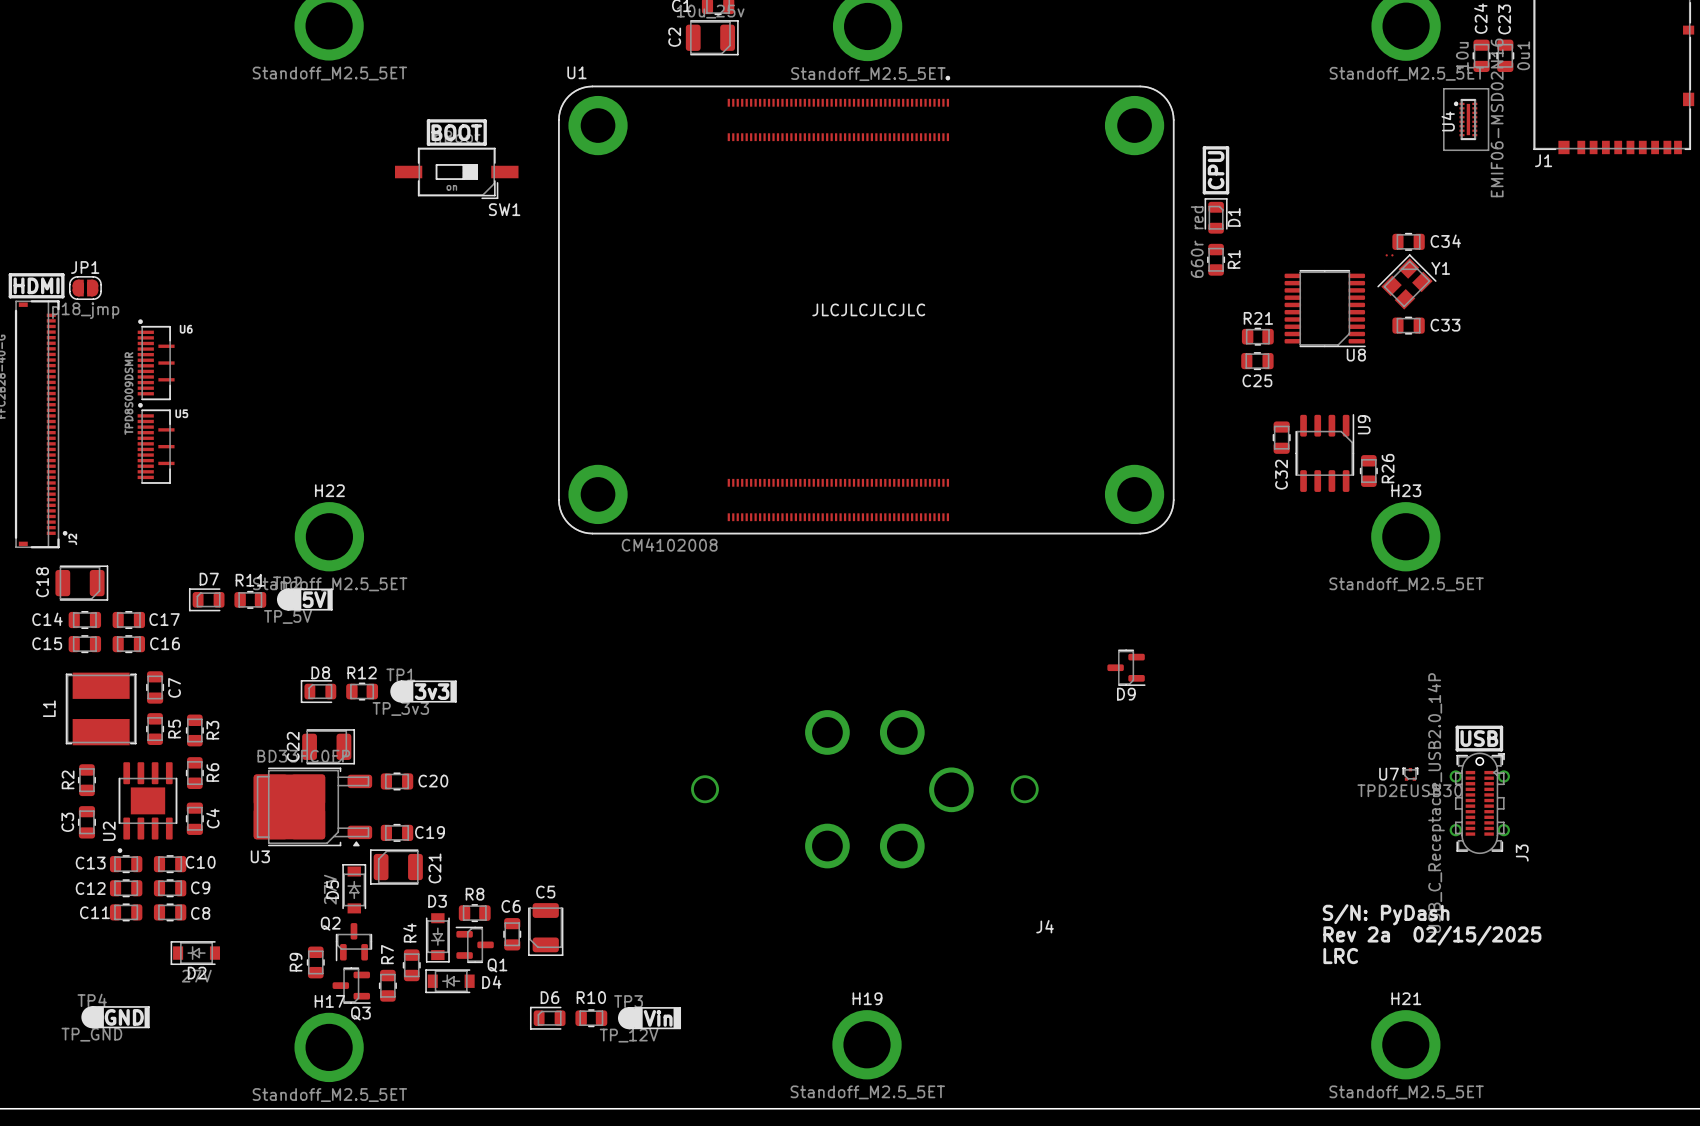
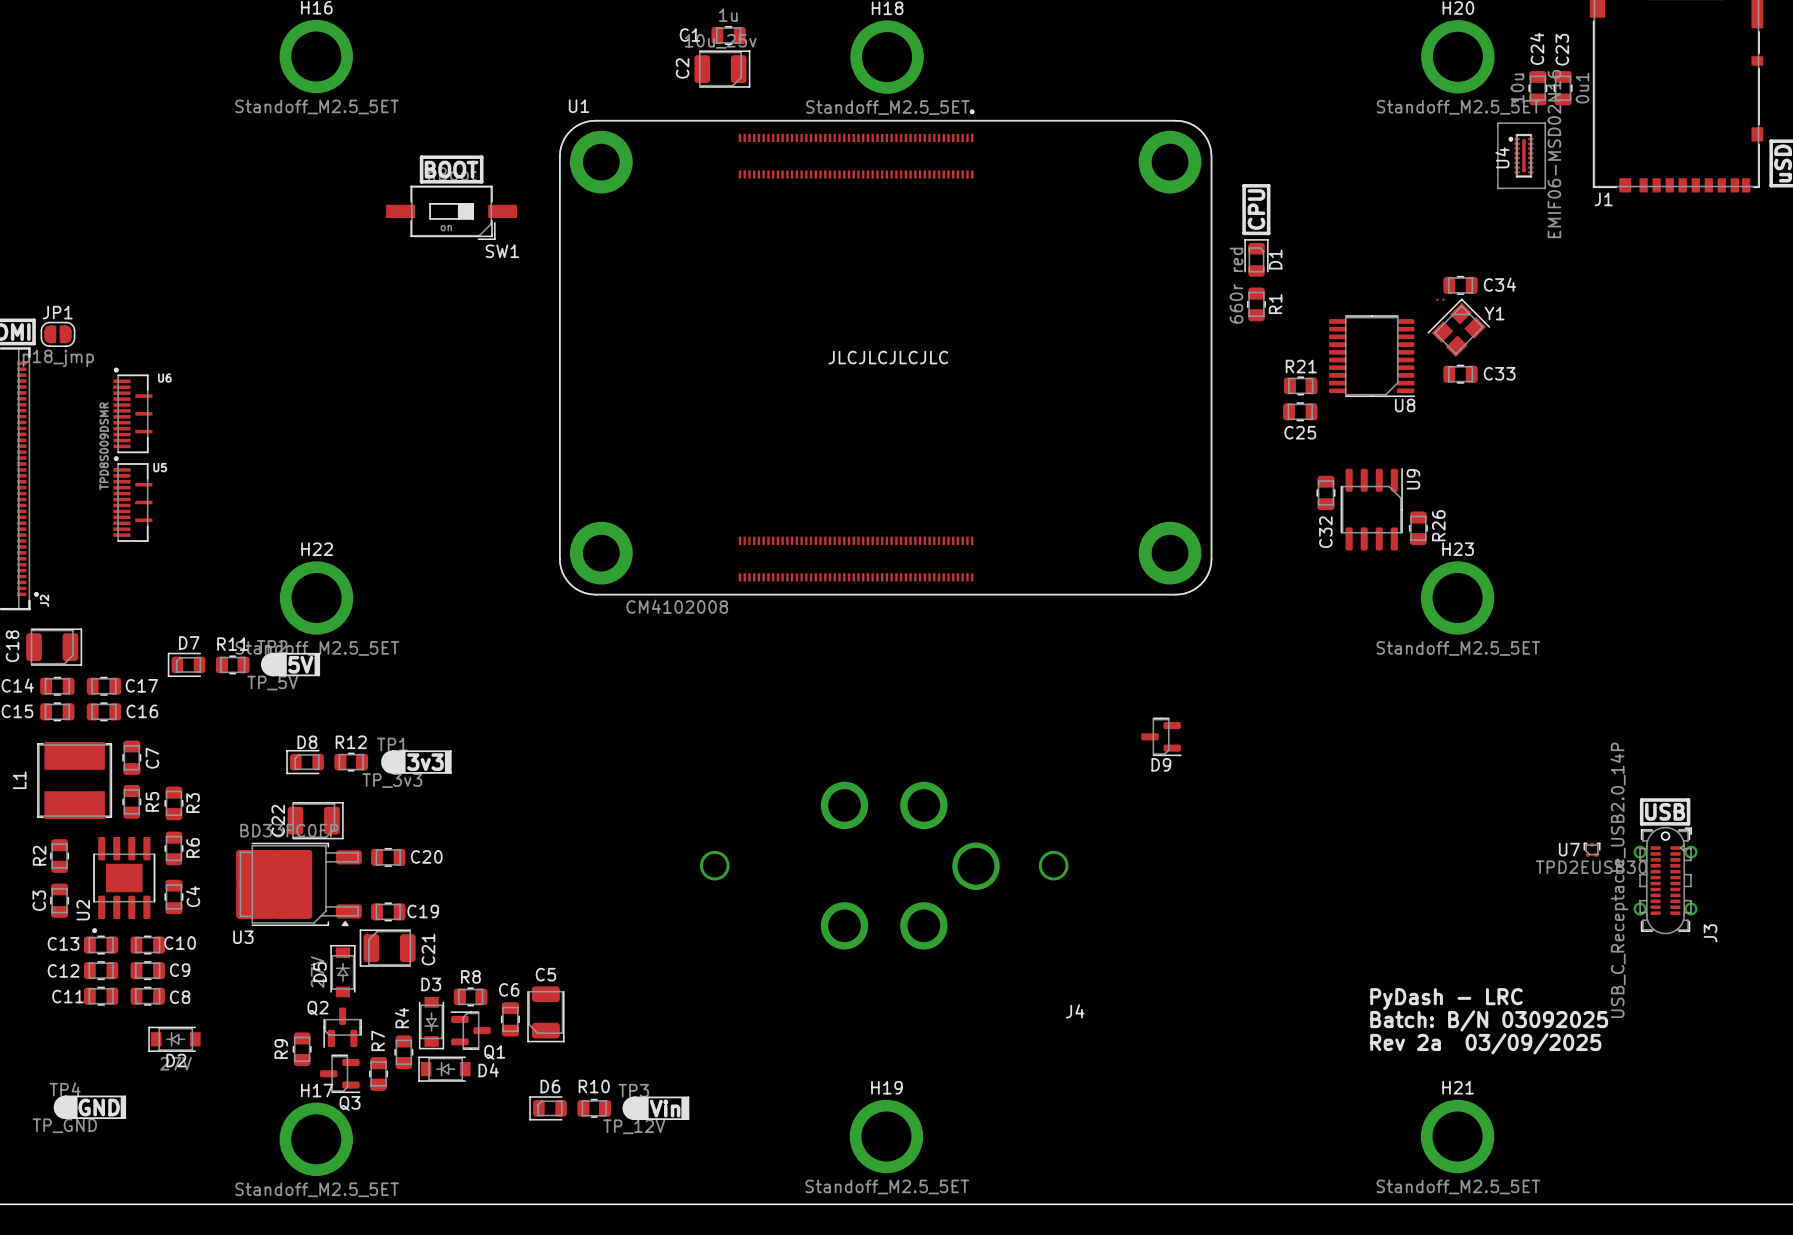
line: (1457, 727) (1501, 727) (1501, 749) (1457, 749) (1457, 727) -> (1641, 800) (1688, 800) (1688, 823) (1641, 823) (1641, 800)
text position: USB (1479, 738) -> USB (1665, 811)
U7 position: (1410, 774) -> (1592, 849)
J3 position: (1479, 803) -> (1665, 880)
text: S/N: PyDash (1386, 914) -> PyDash - LRC (1446, 999)
text: Rev 2a 02/15/2025 (1432, 935) -> Batch: B/N 03092025 (1489, 1020)
text: LRC (1340, 956) -> Rev 2a 03/09/2025 (1485, 1043)

